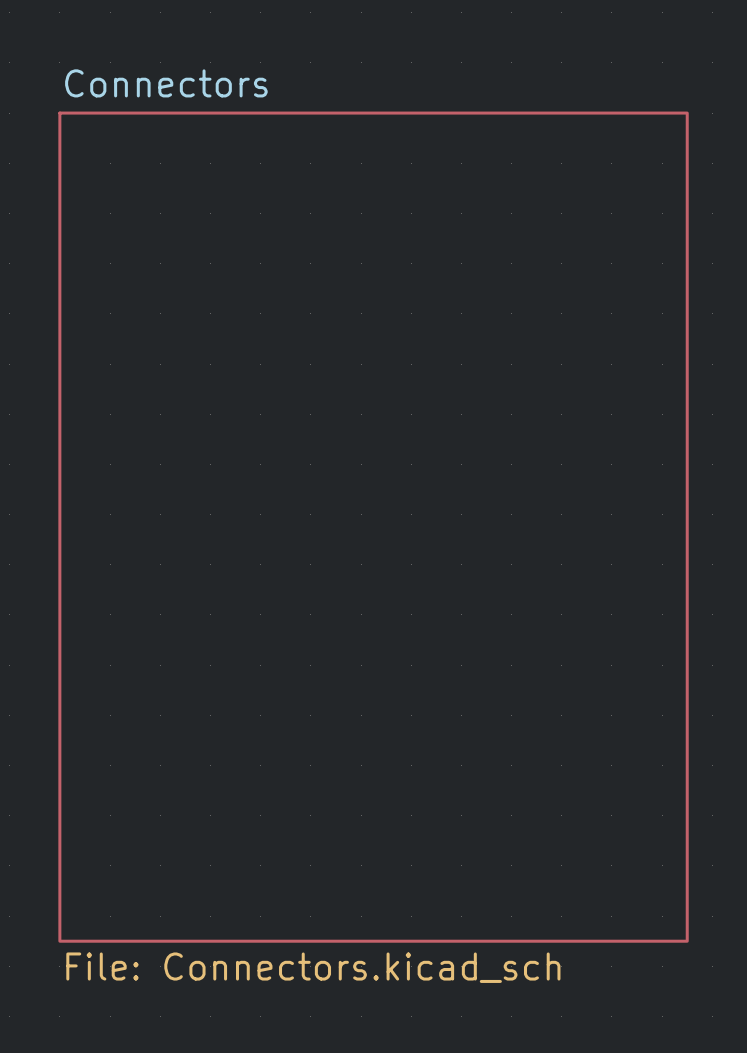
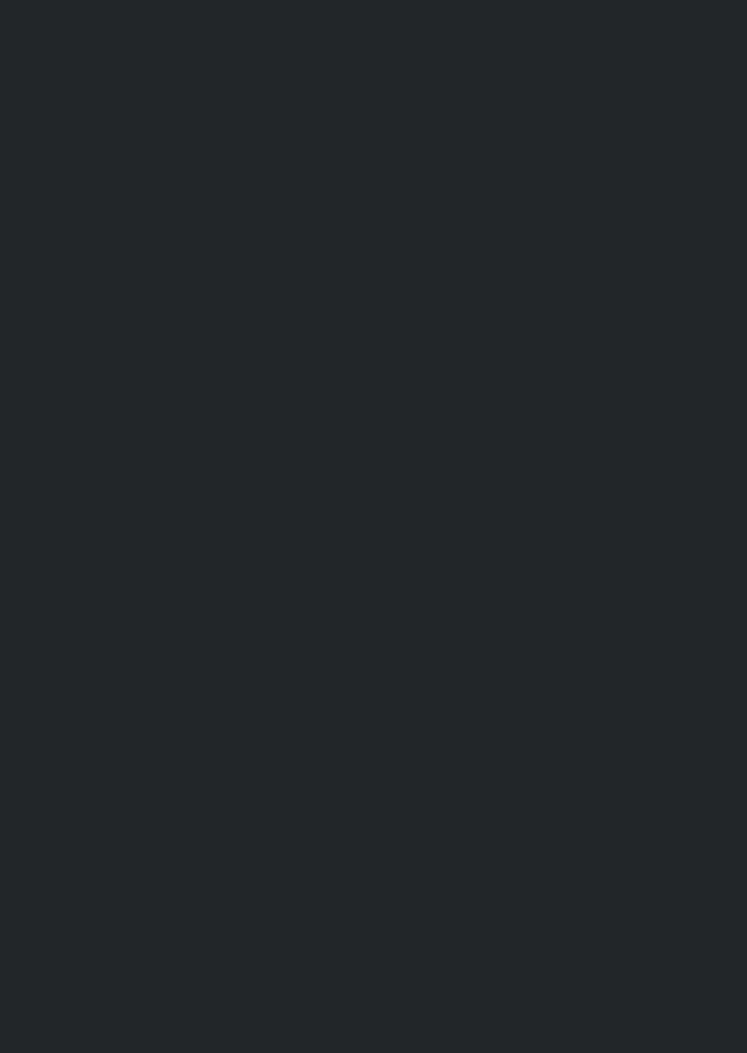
sheet Connectors: File: Connectors.kicad_sch (373, 527) -> none

